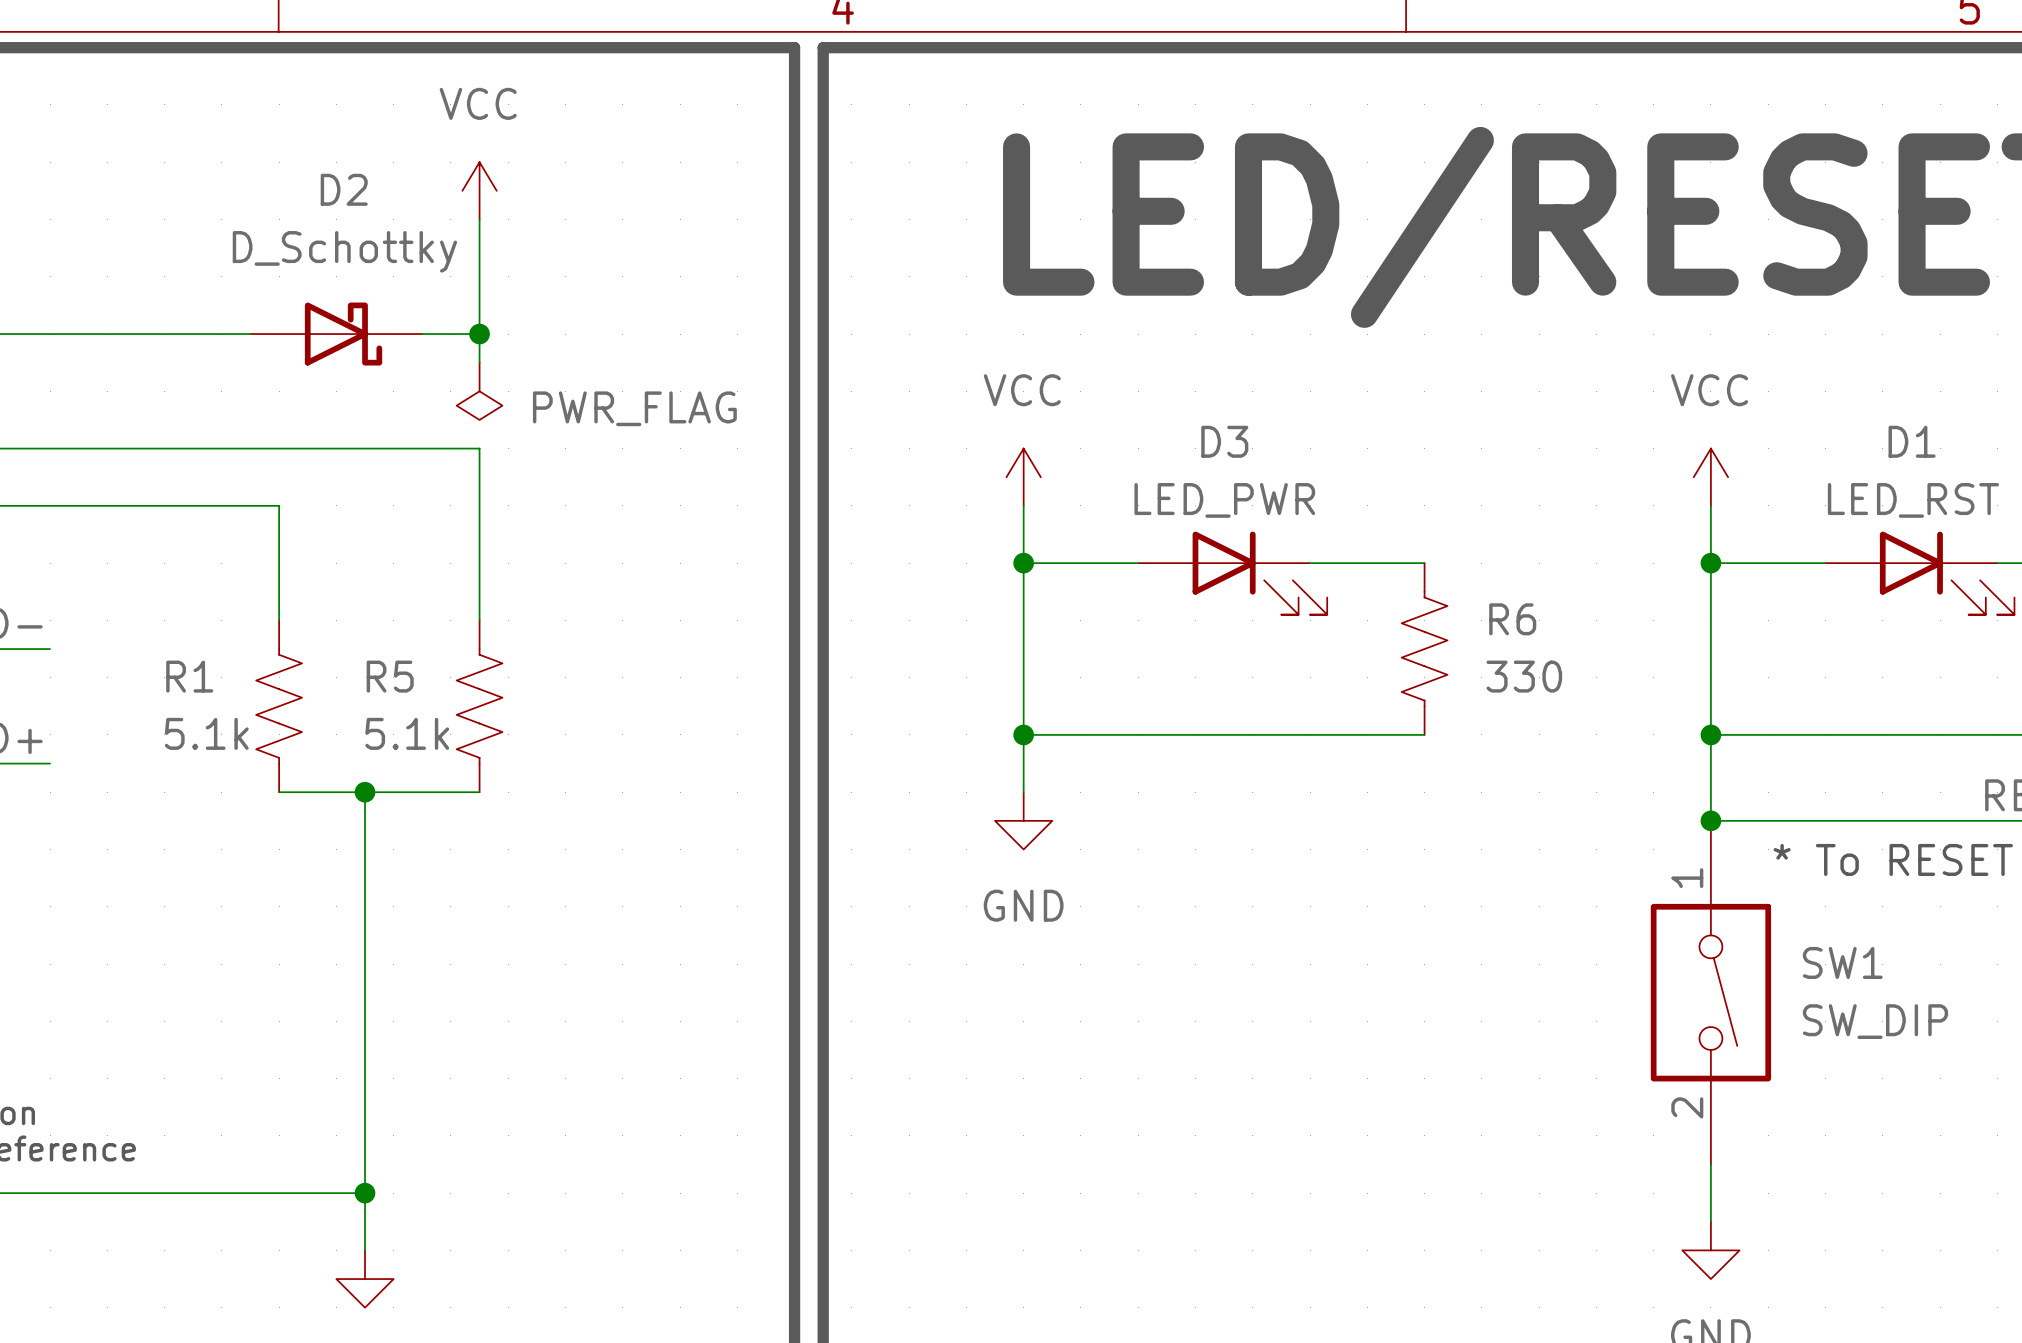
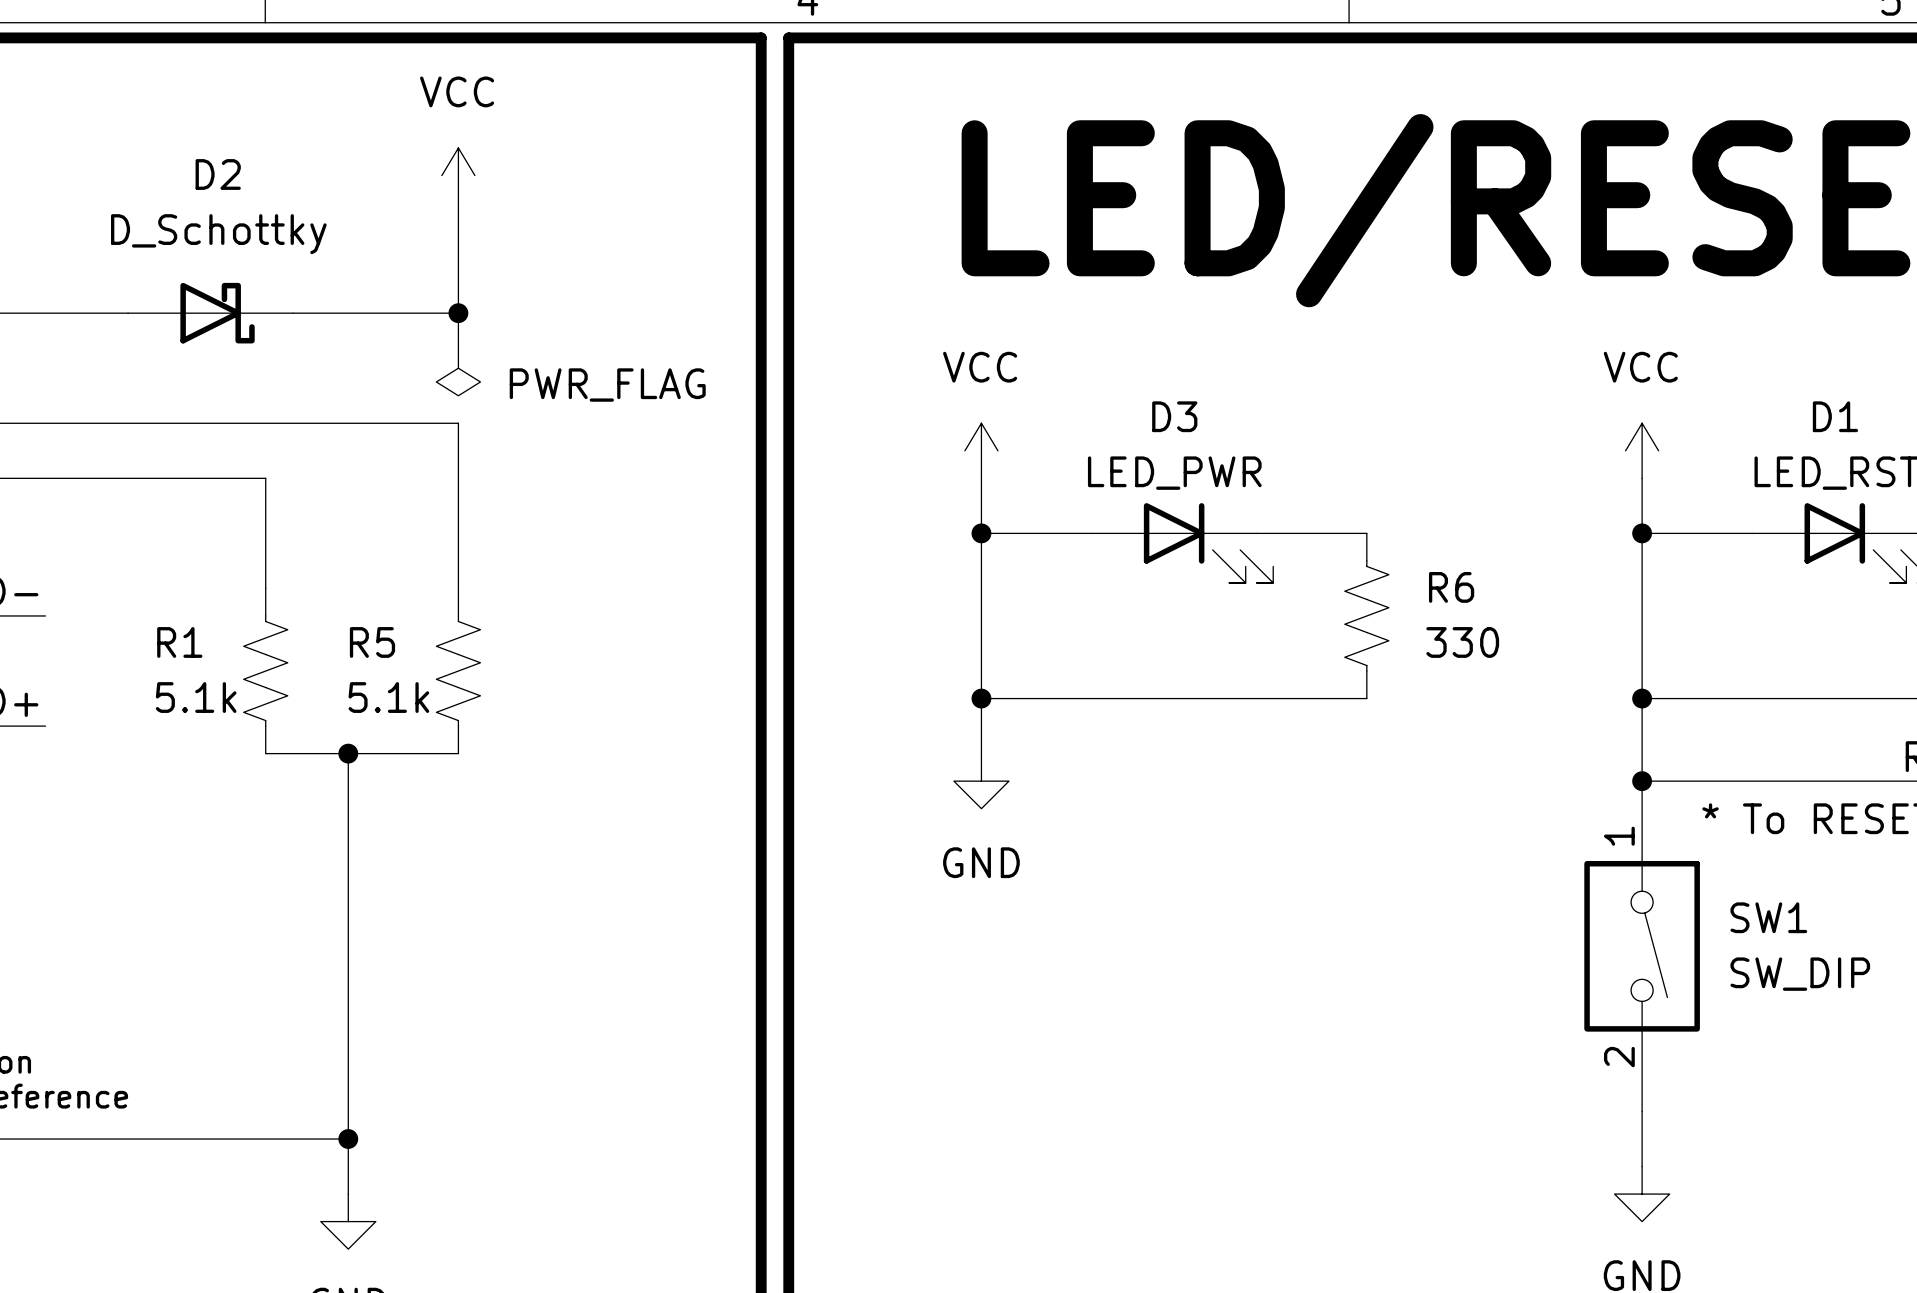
D2 position: (336, 334) -> (210, 313)

